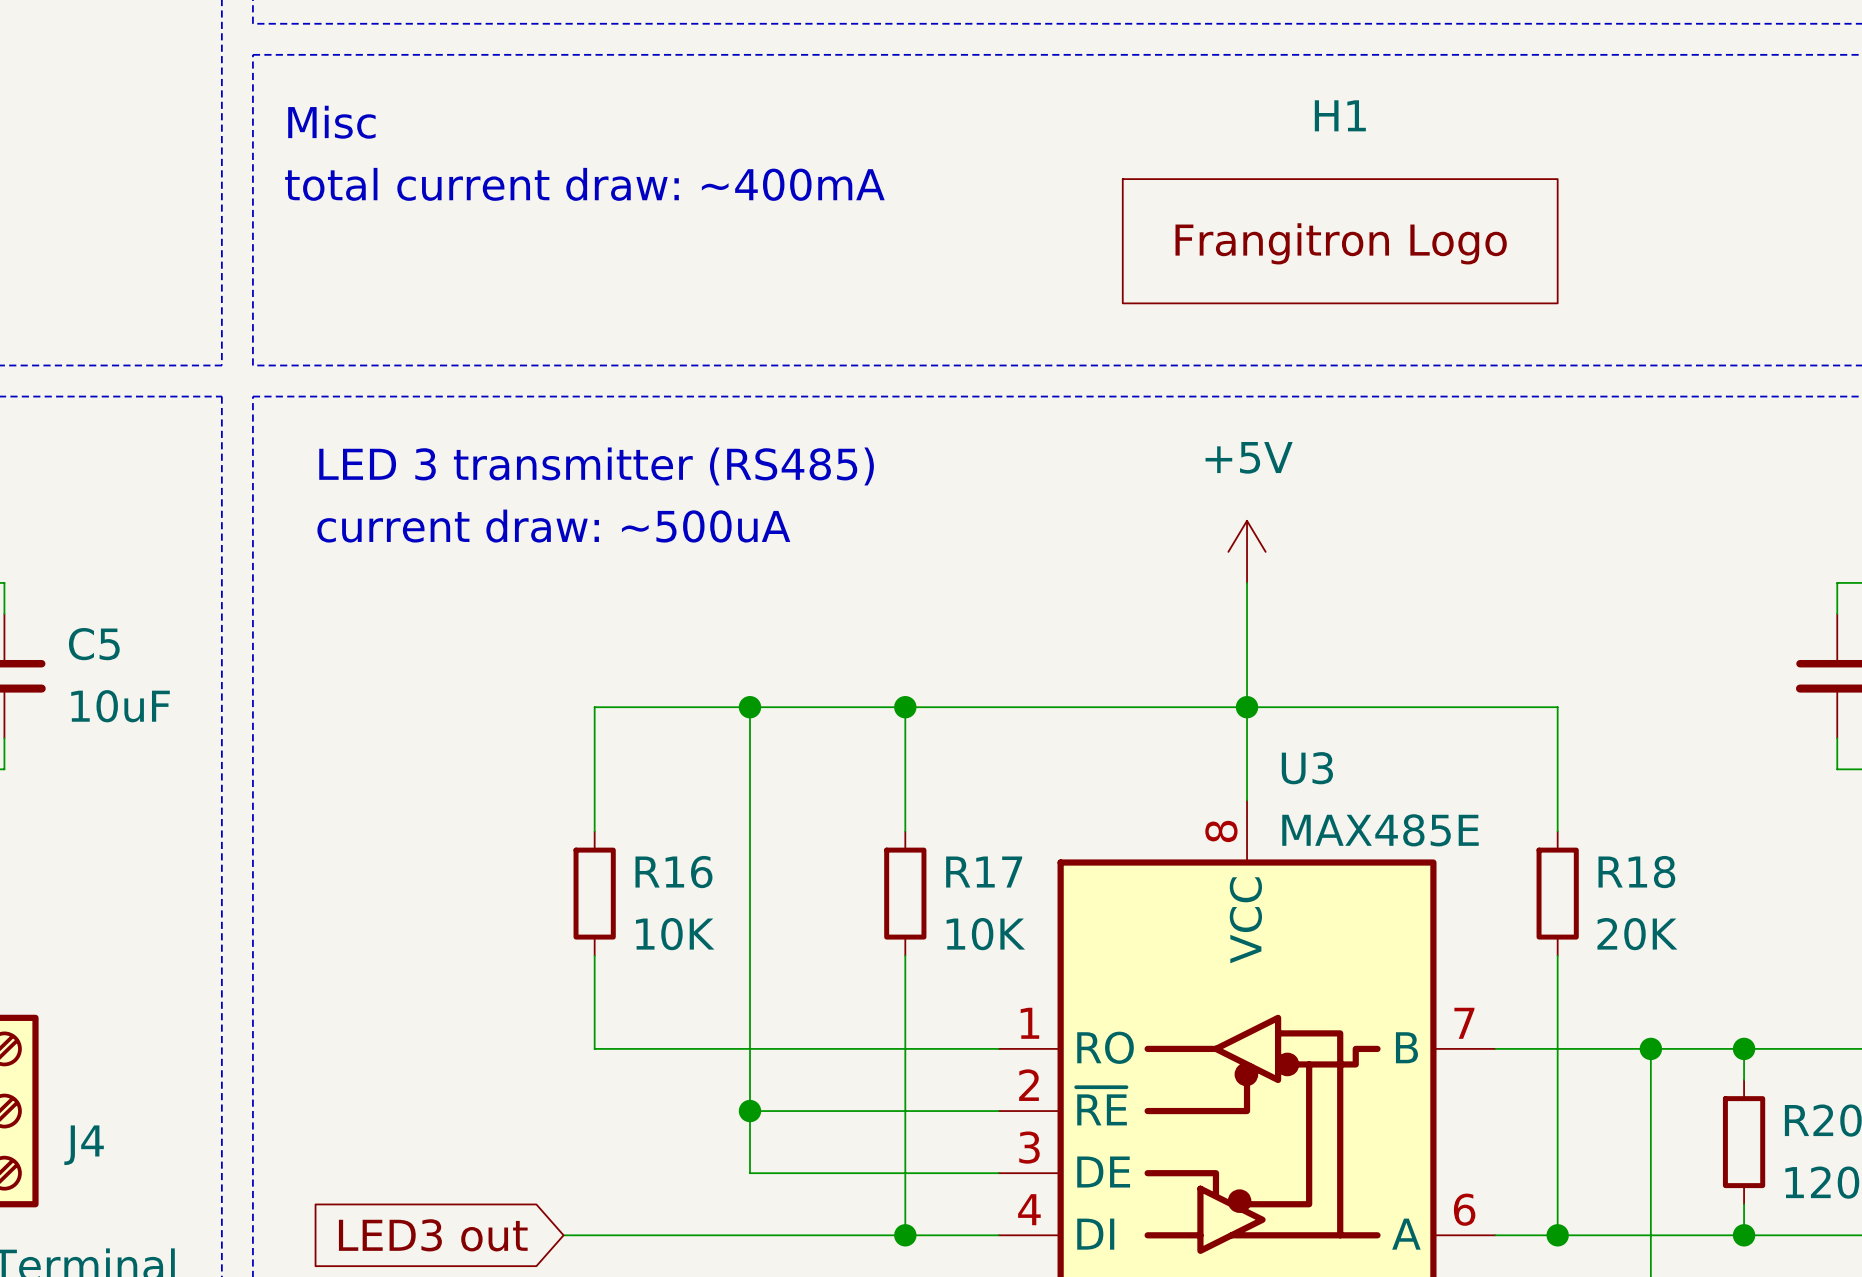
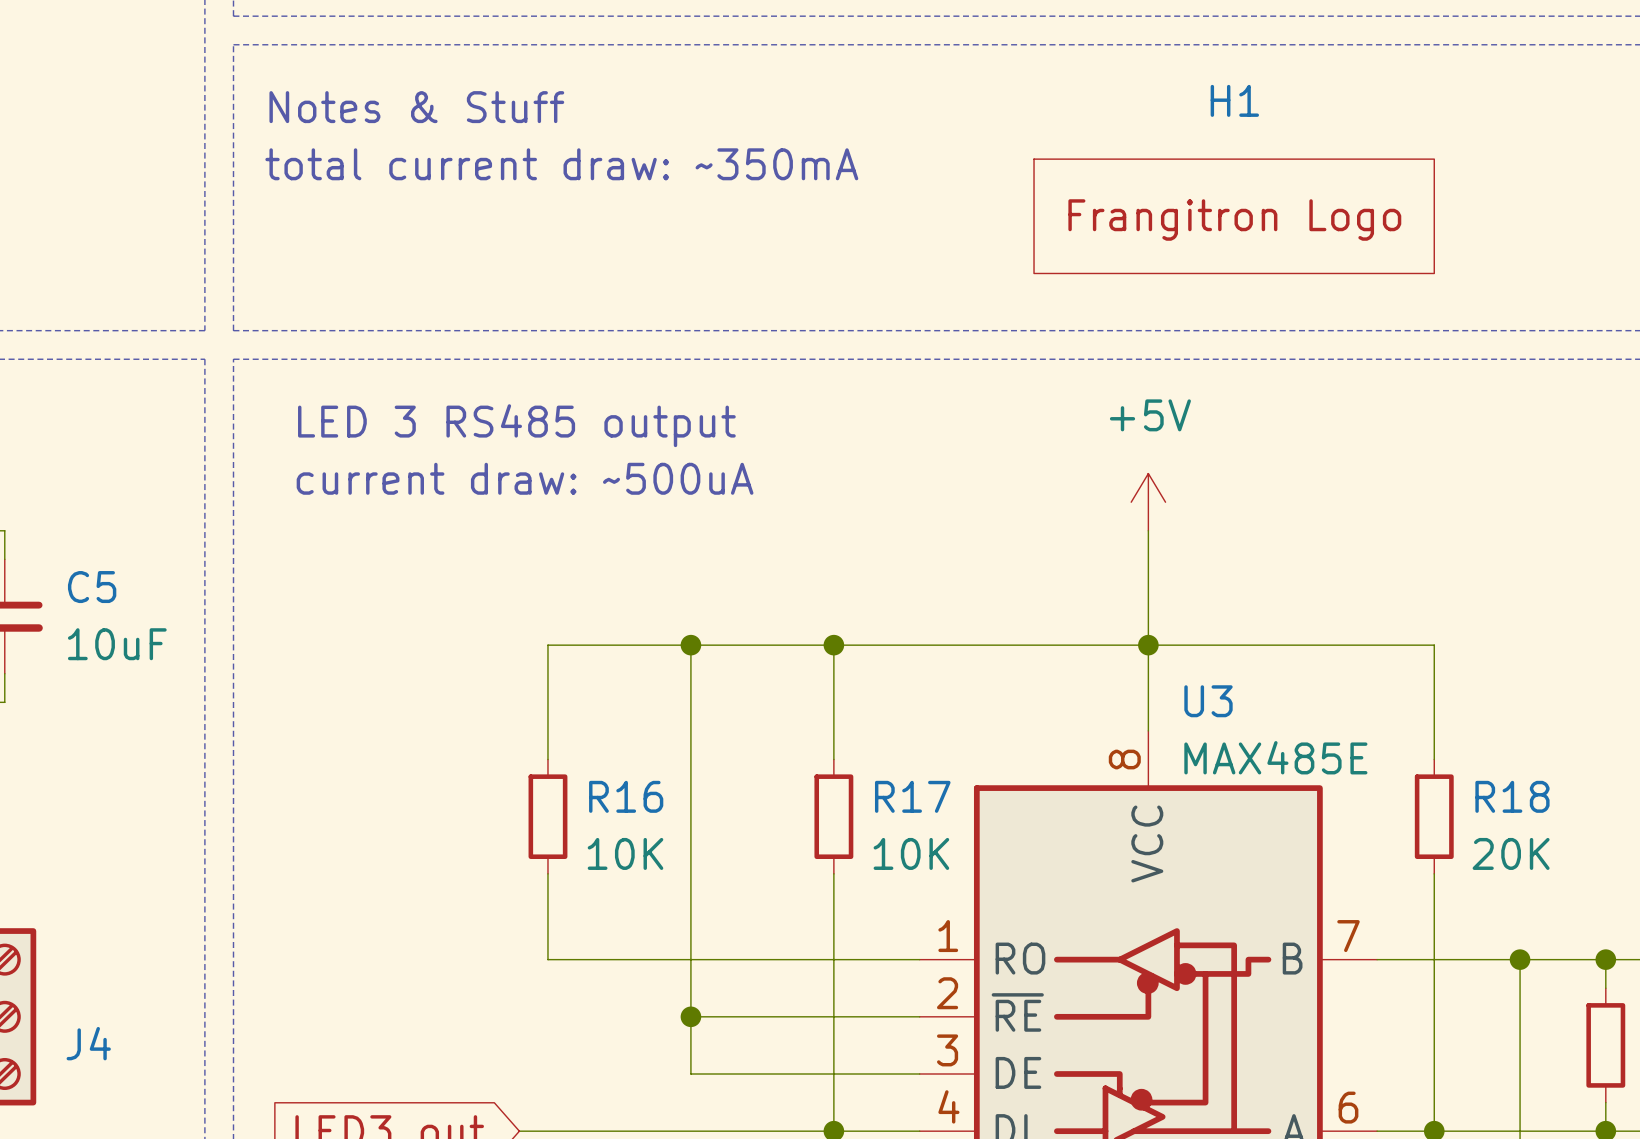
text: Misc (331, 122) -> Notes & Stuff (416, 107)
text: total current draw: ~400mA (584, 184) -> total current draw: ~350mA (561, 164)
text: LED 3 transmitter (RS485) (596, 466) -> LED 3 RS485 output (516, 425)

